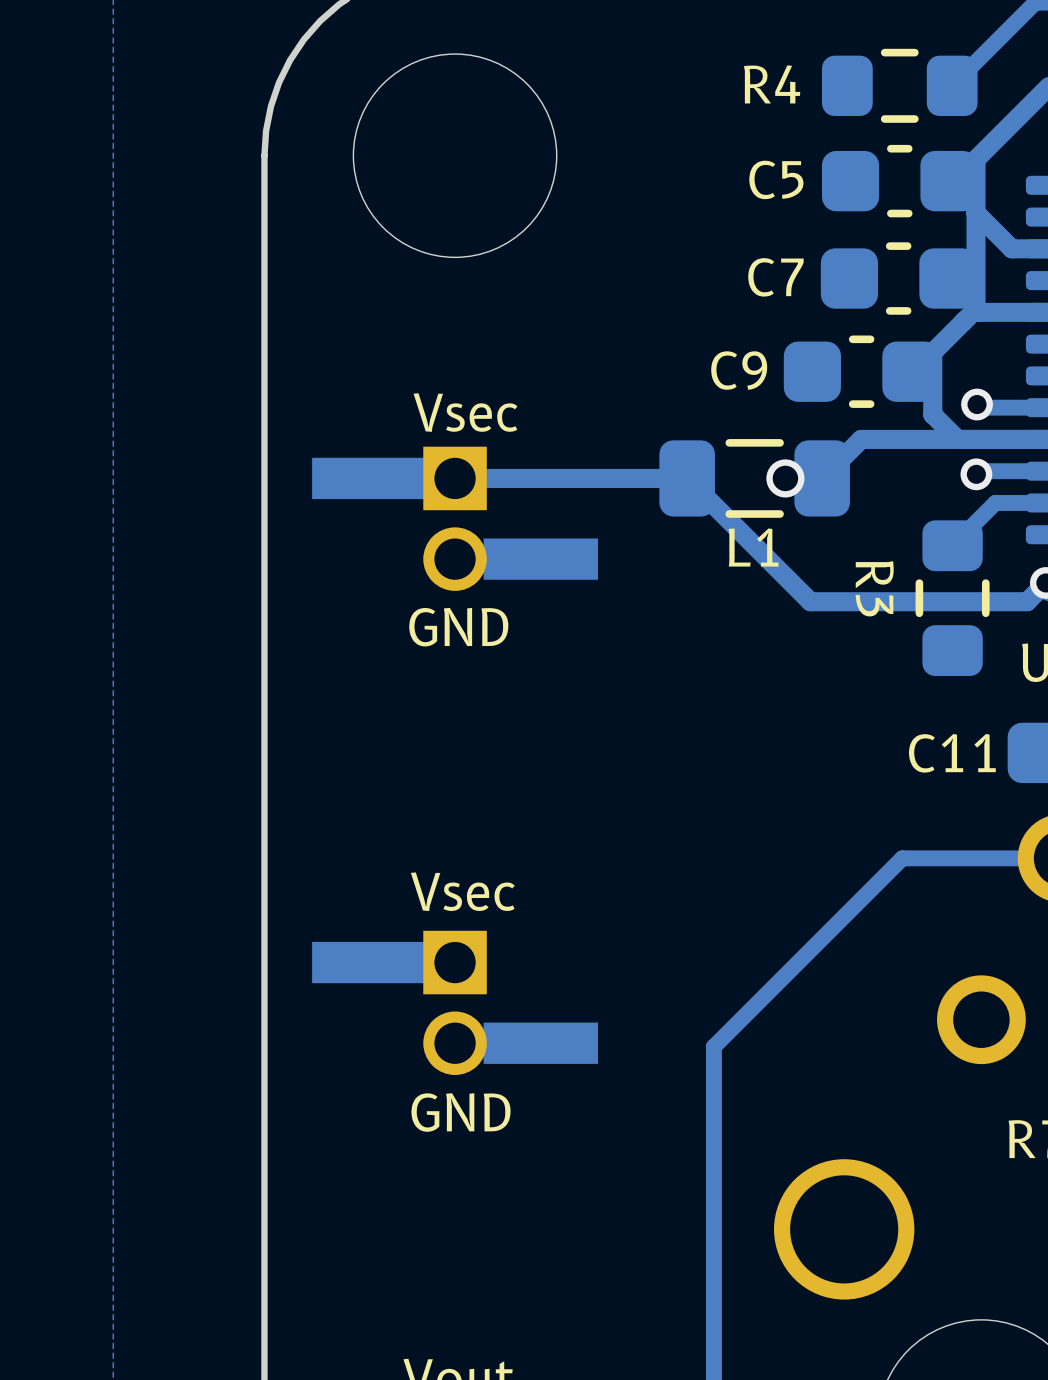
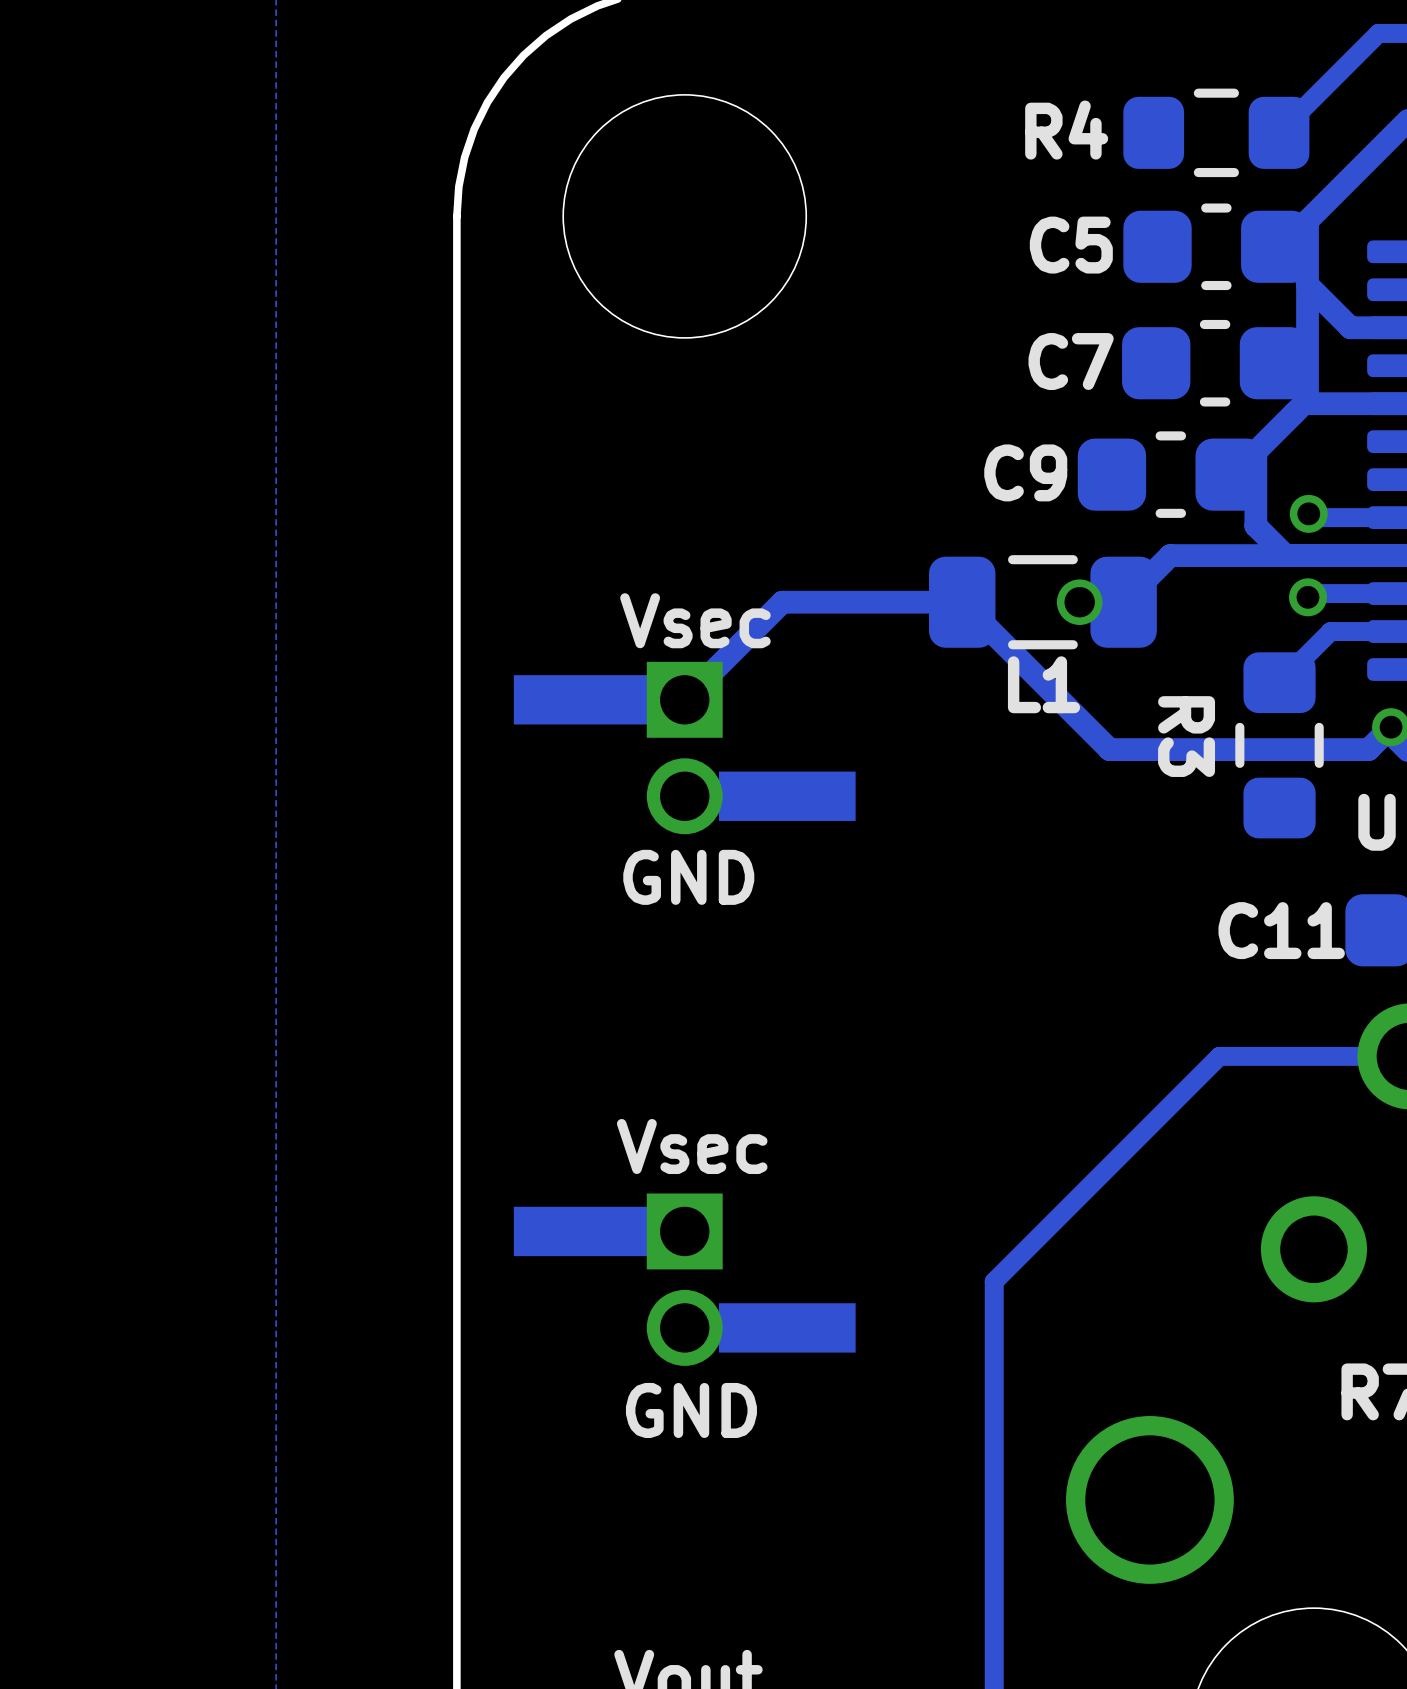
text position: Vsec (465, 412) -> Vsec (695, 620)
track: (536, 478) (455, 478) -> (782, 602) (684, 699)
part position: (455, 518) -> (684, 748)
text position: GND (458, 627) -> GND (688, 877)
text position: Vsec (462, 891) -> Vsec (692, 1146)
part position: (455, 1002) -> (684, 1279)
text position: GND (461, 1112) -> GND (691, 1410)

